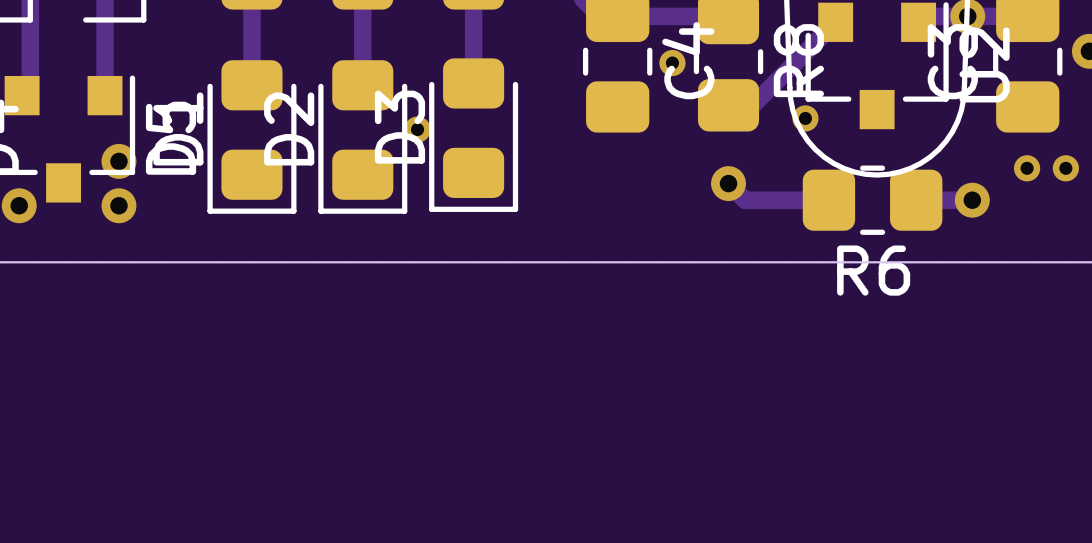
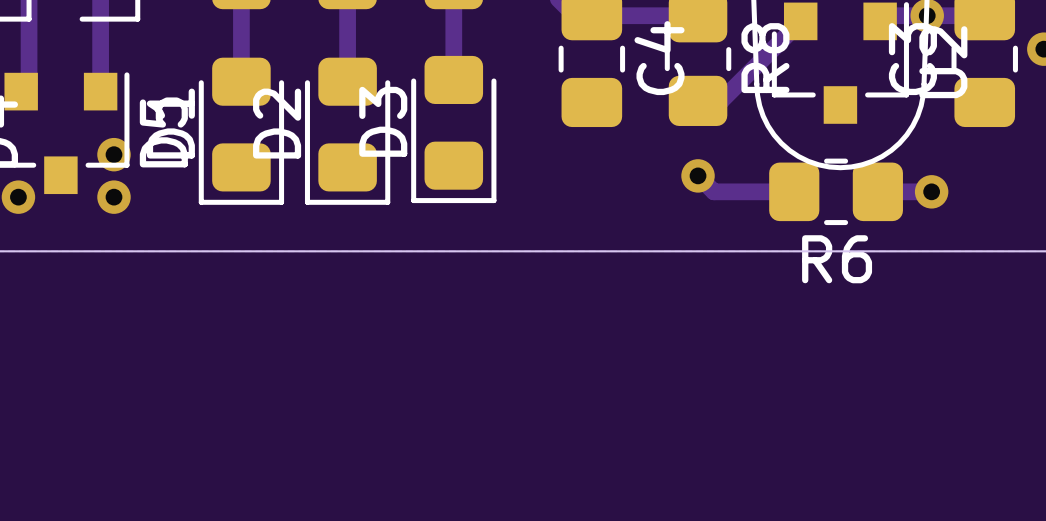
via: (672, 63) -> none
via: (805, 118) -> none
via: (417, 129) -> none
via: (1027, 168) -> none
via: (1065, 168) -> none

